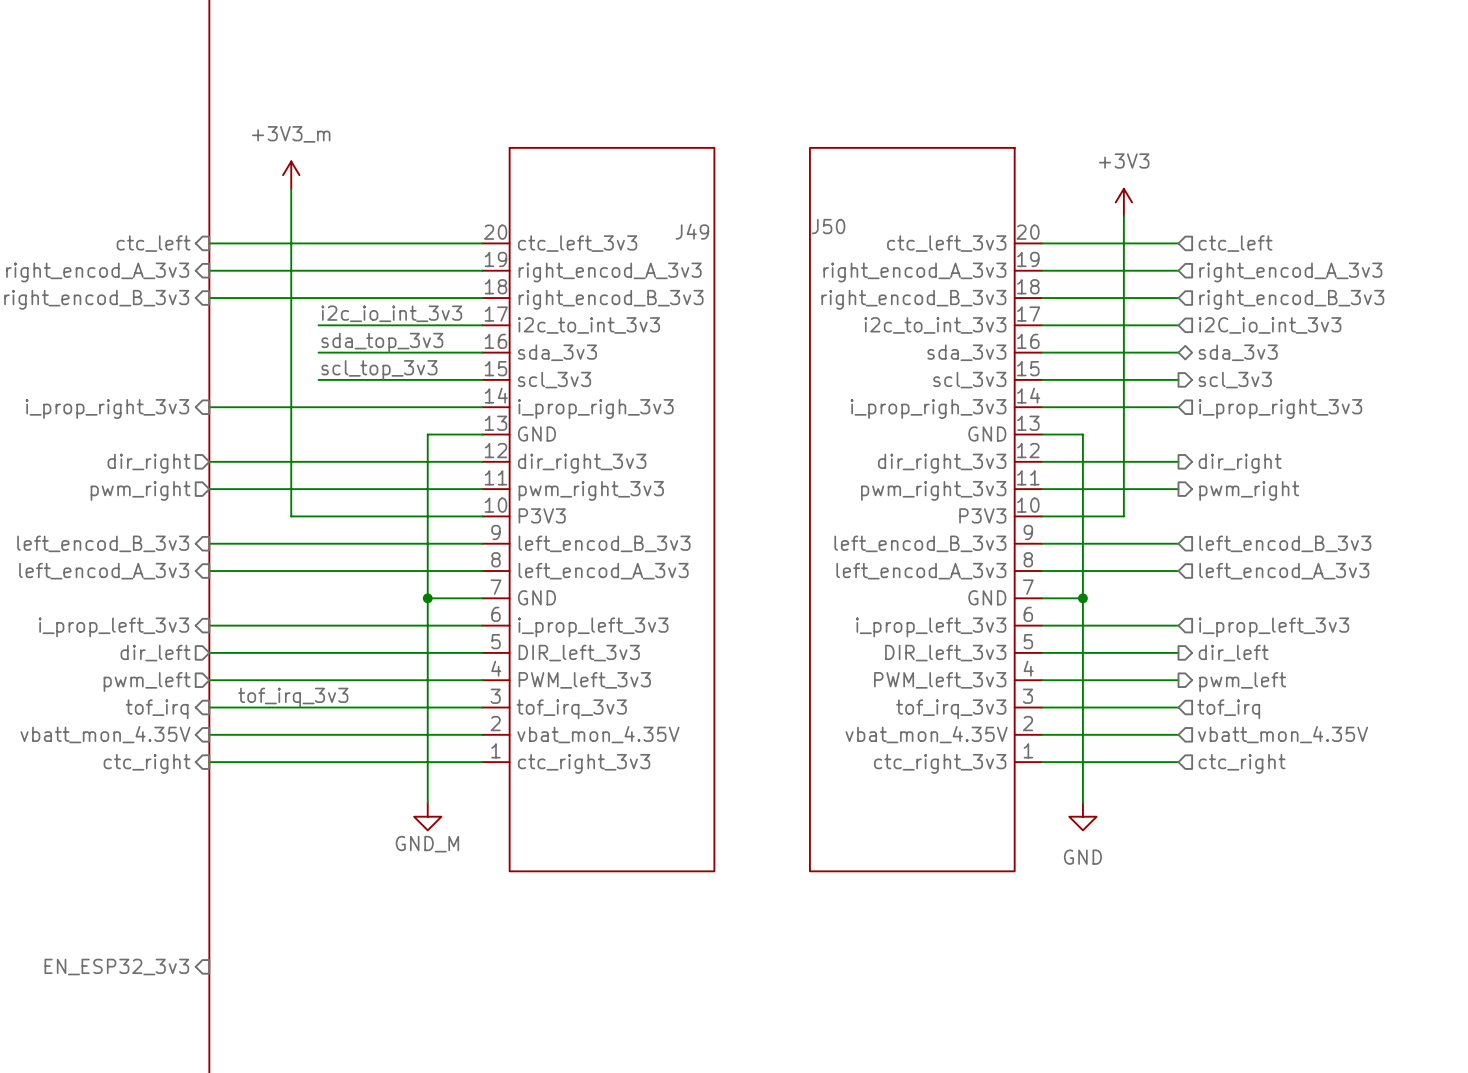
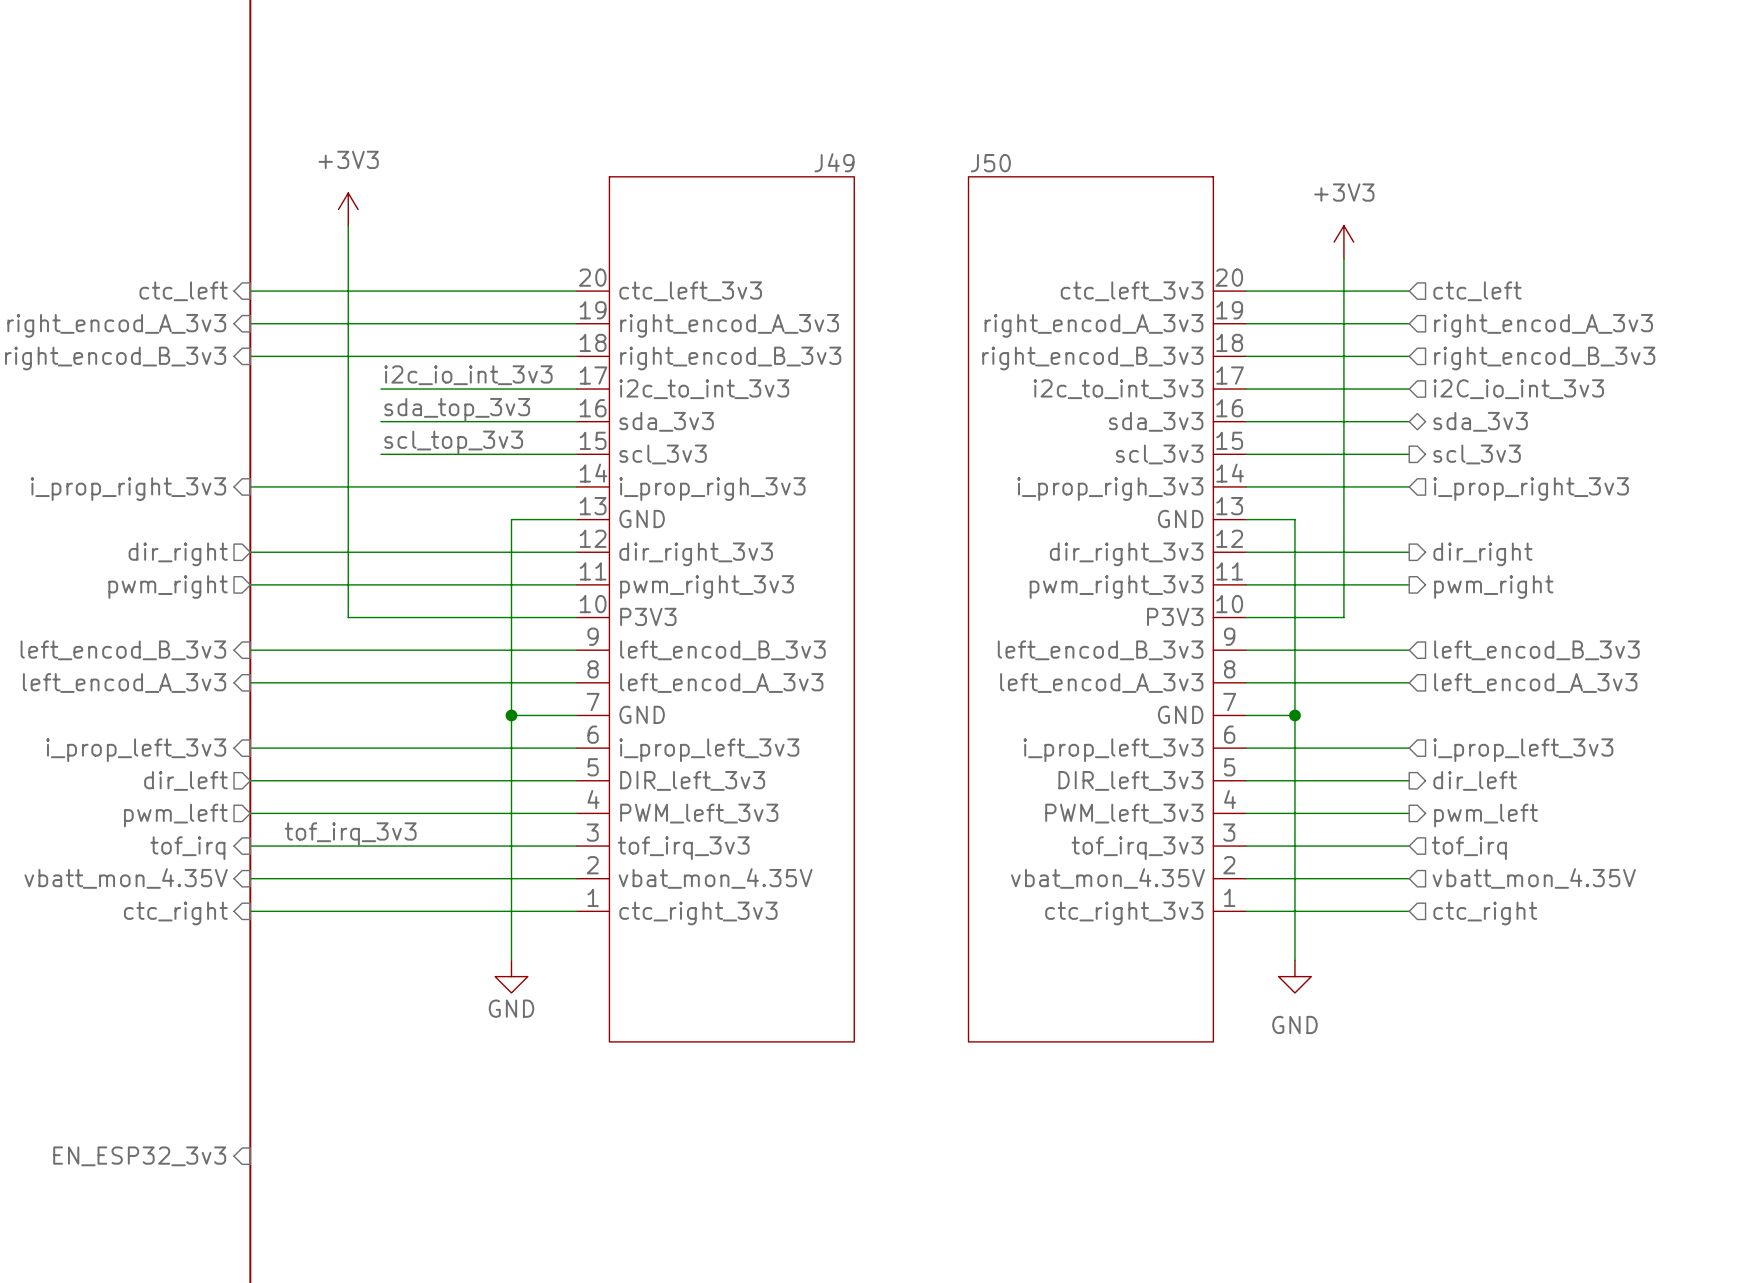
power symbol: +3V3_m (291, 175) -> +3V3 (348, 209)
J50 name position: J50 (828, 226) -> J50 (990, 163)
J49 name position: J49 (692, 231) -> J49 (834, 162)
power symbol: GND_M (427, 816) -> GND (511, 976)

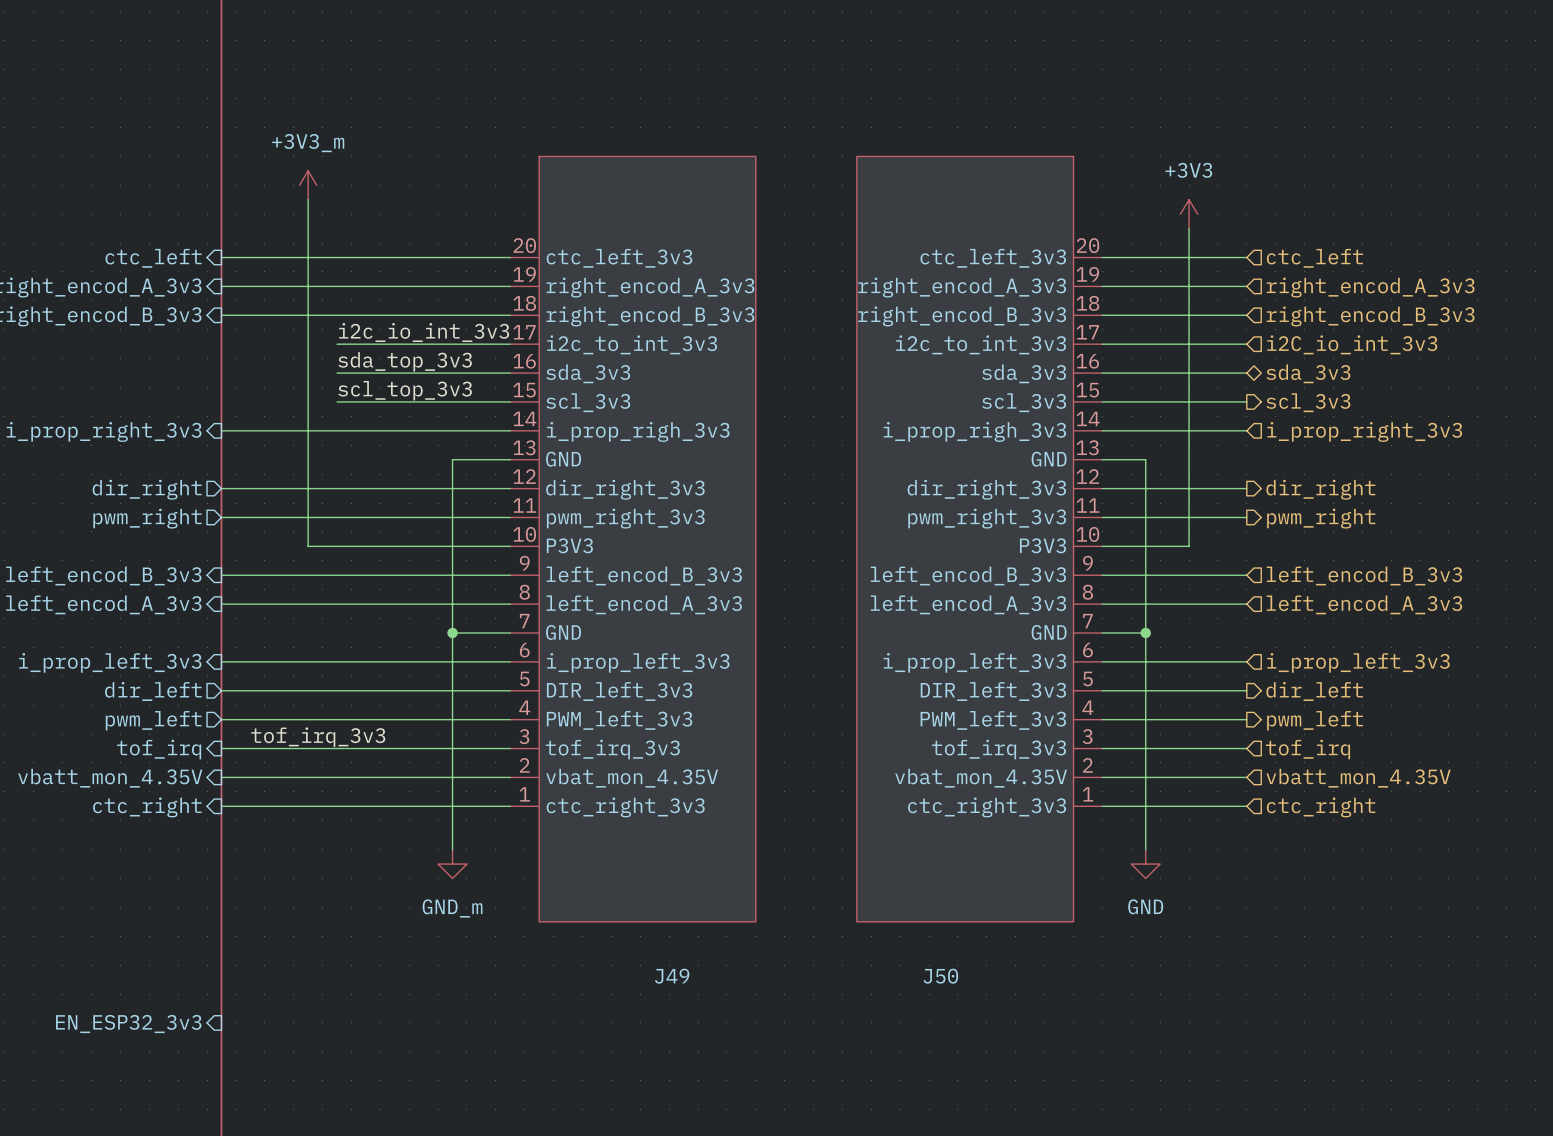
J49 name position: J49 (834, 162) -> J49 (672, 976)
J50 name position: J50 (990, 163) -> J50 (940, 976)
power symbol: +3V3 (348, 209) -> +3V3_m (308, 185)
power symbol: GND (511, 976) -> GND_m (452, 864)

